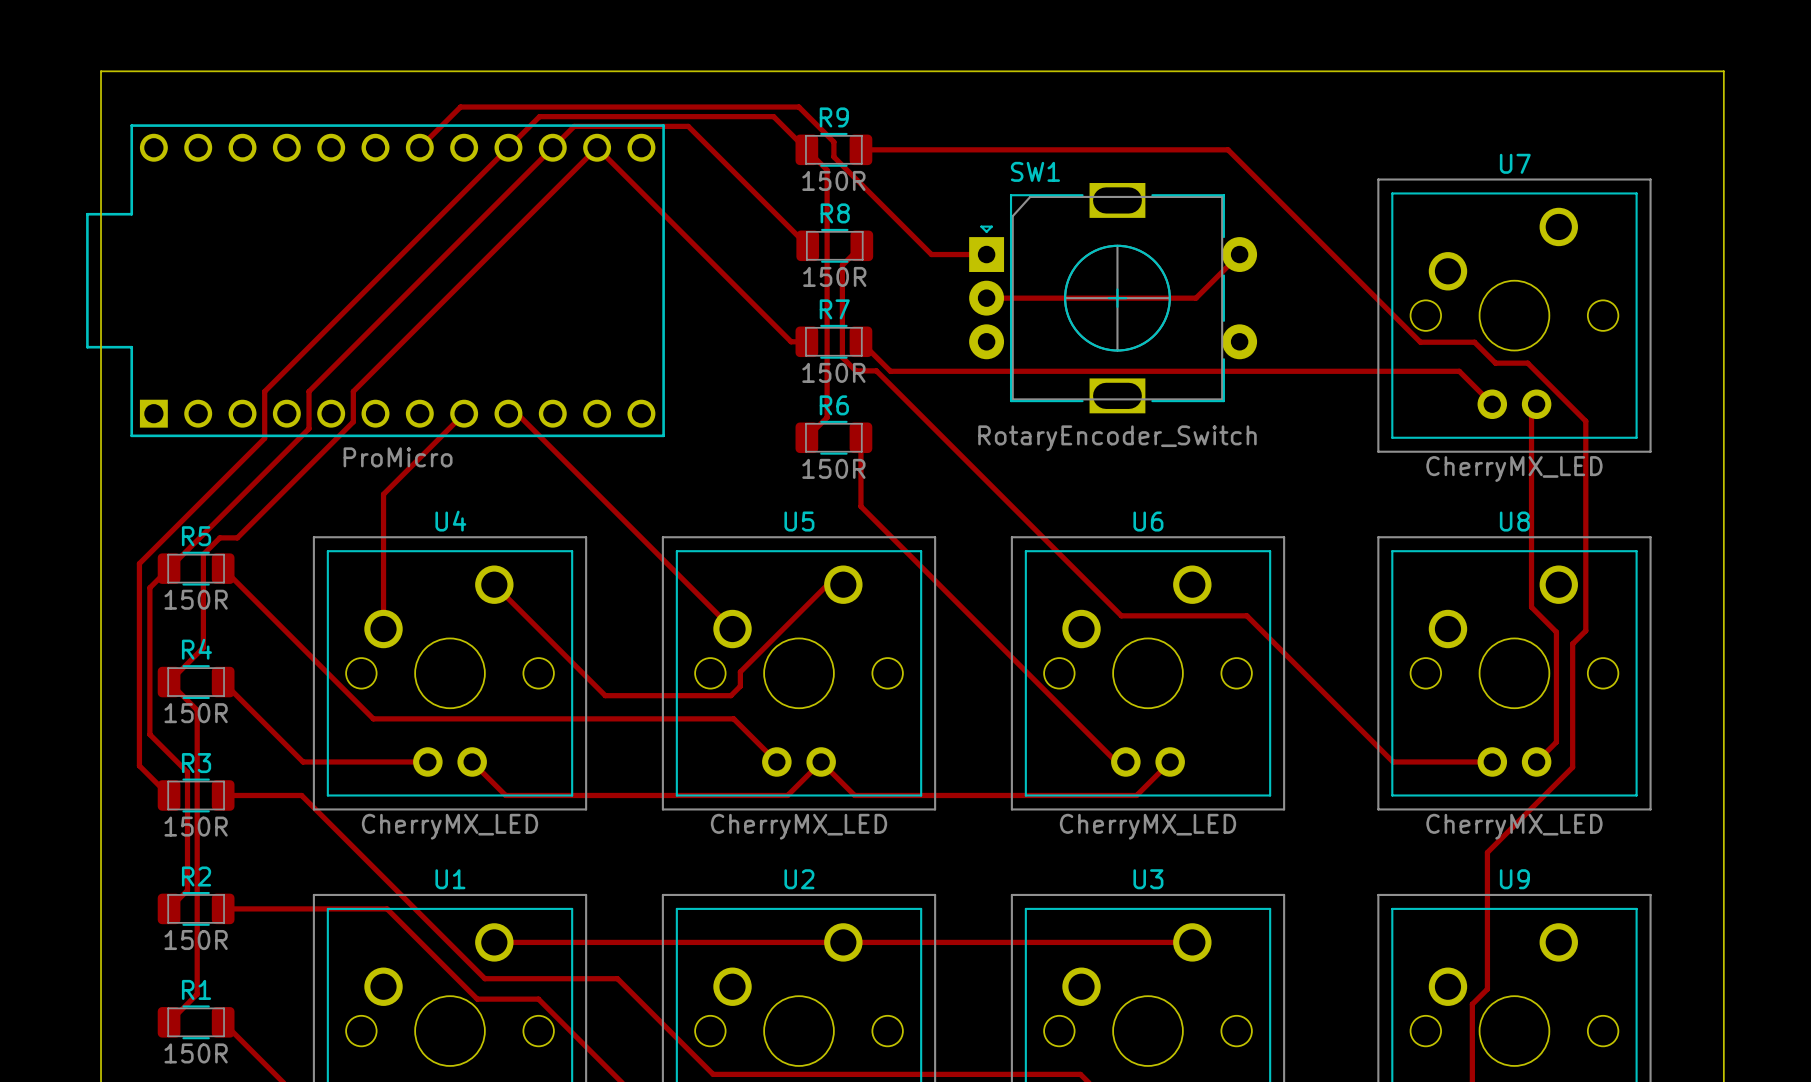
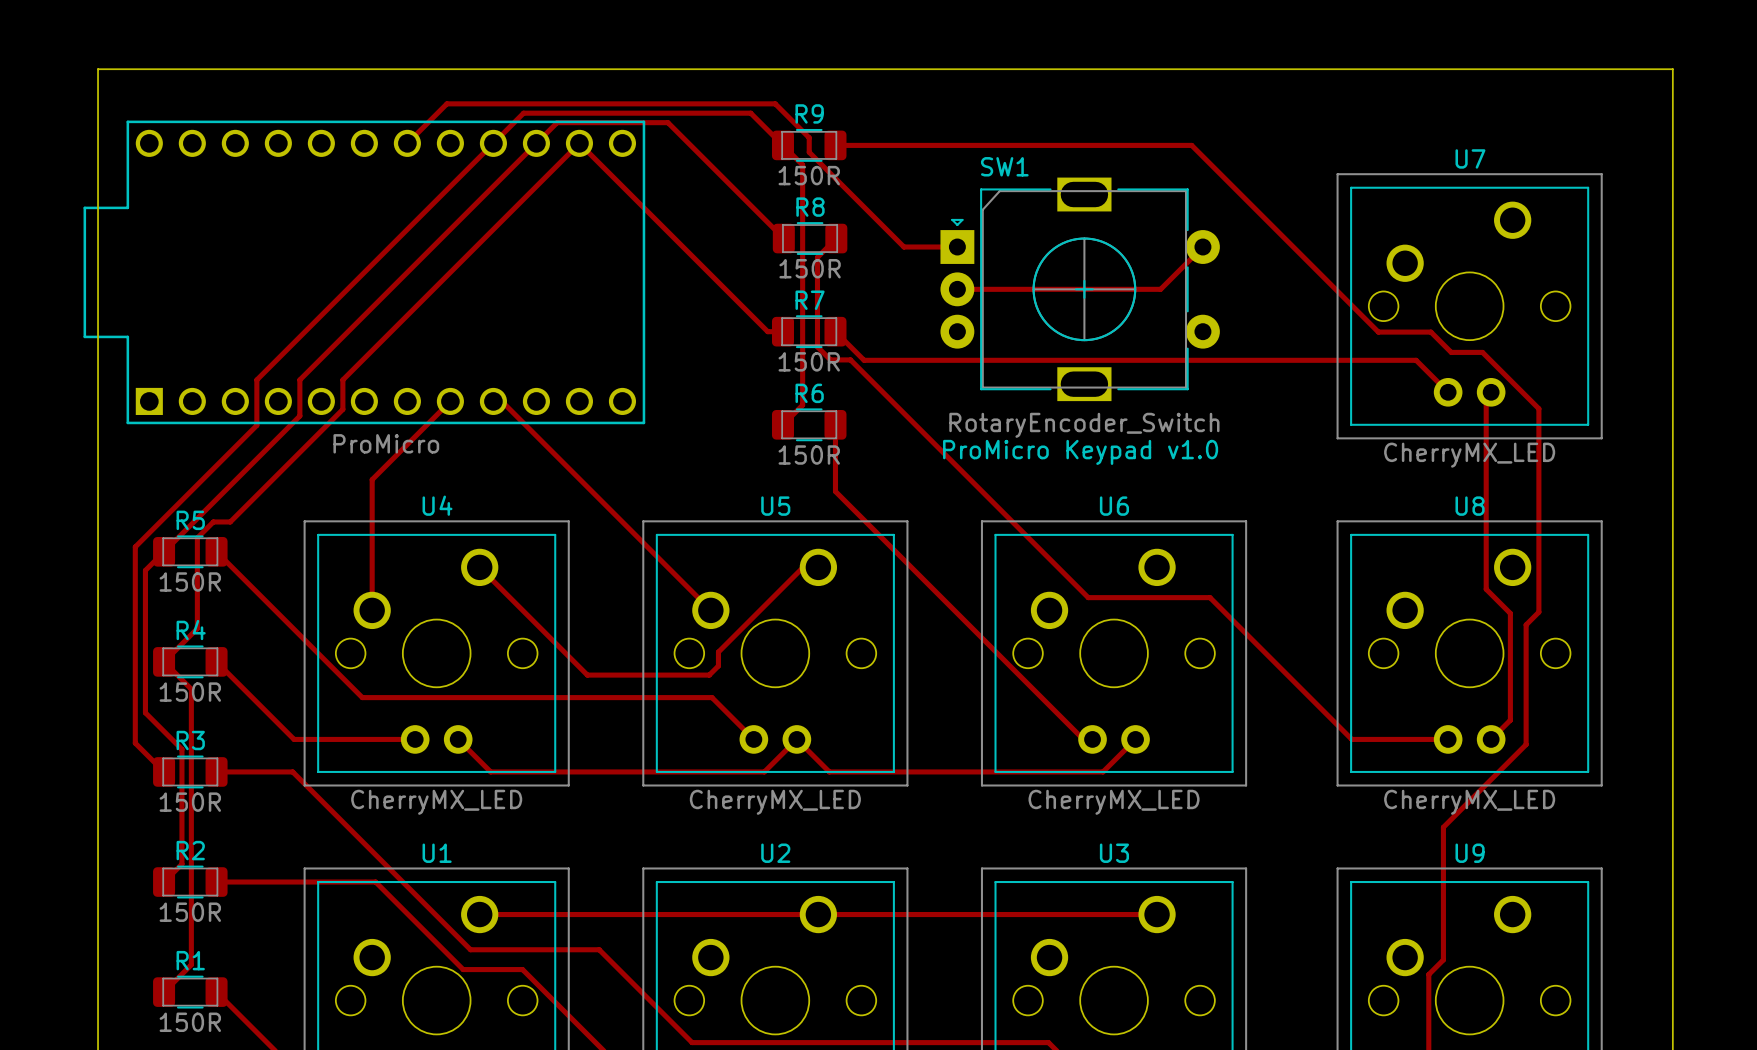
text: none -> ProMicro Keypad v1.0 (1080, 452)

